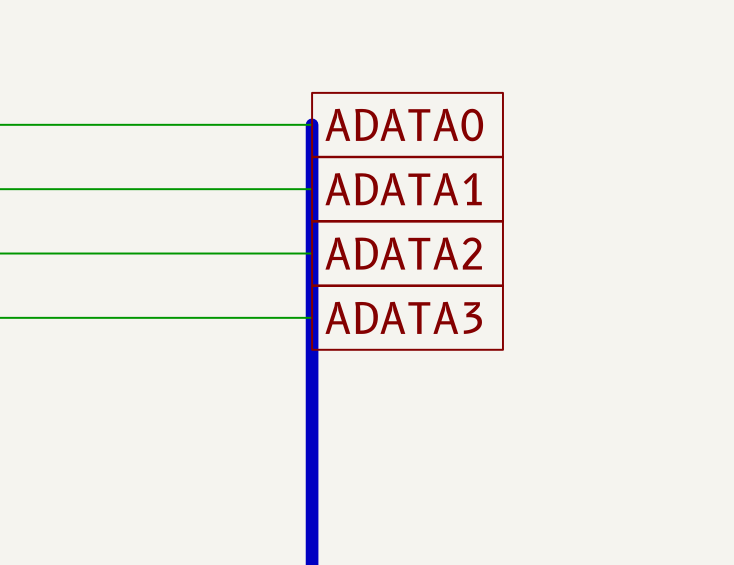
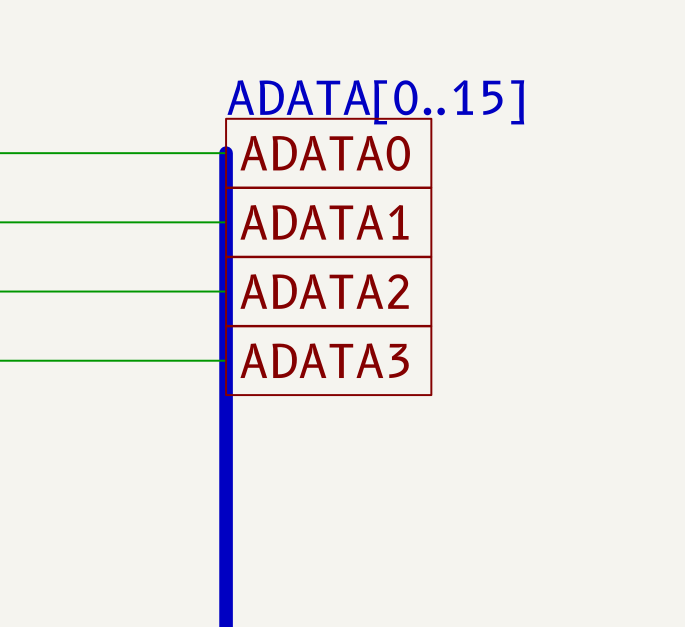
text: none -> ADATA[0..15] (375, 102)

